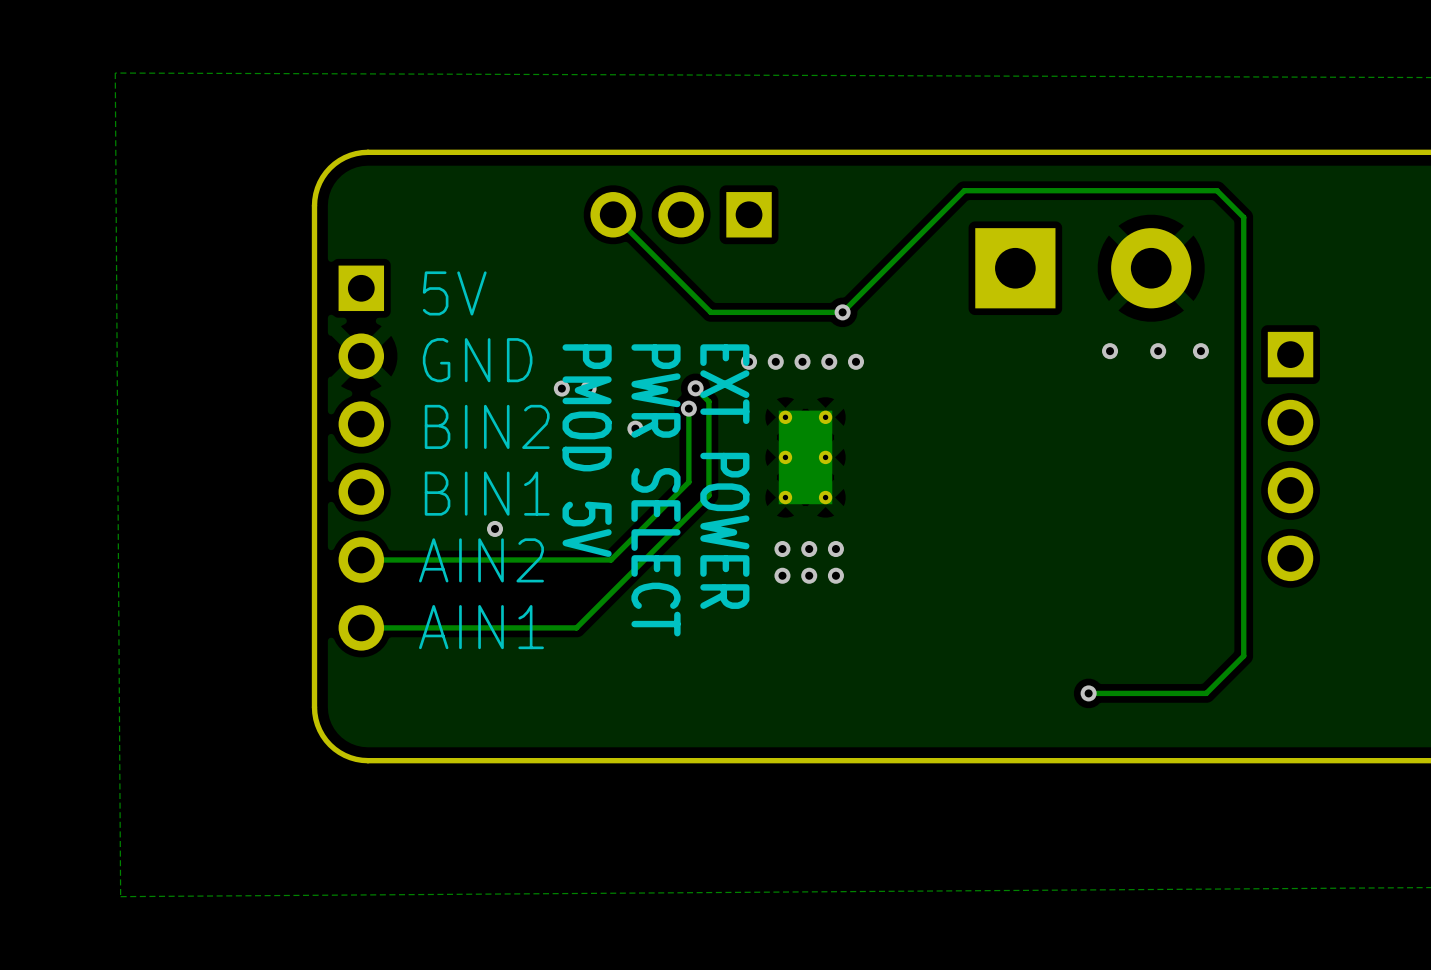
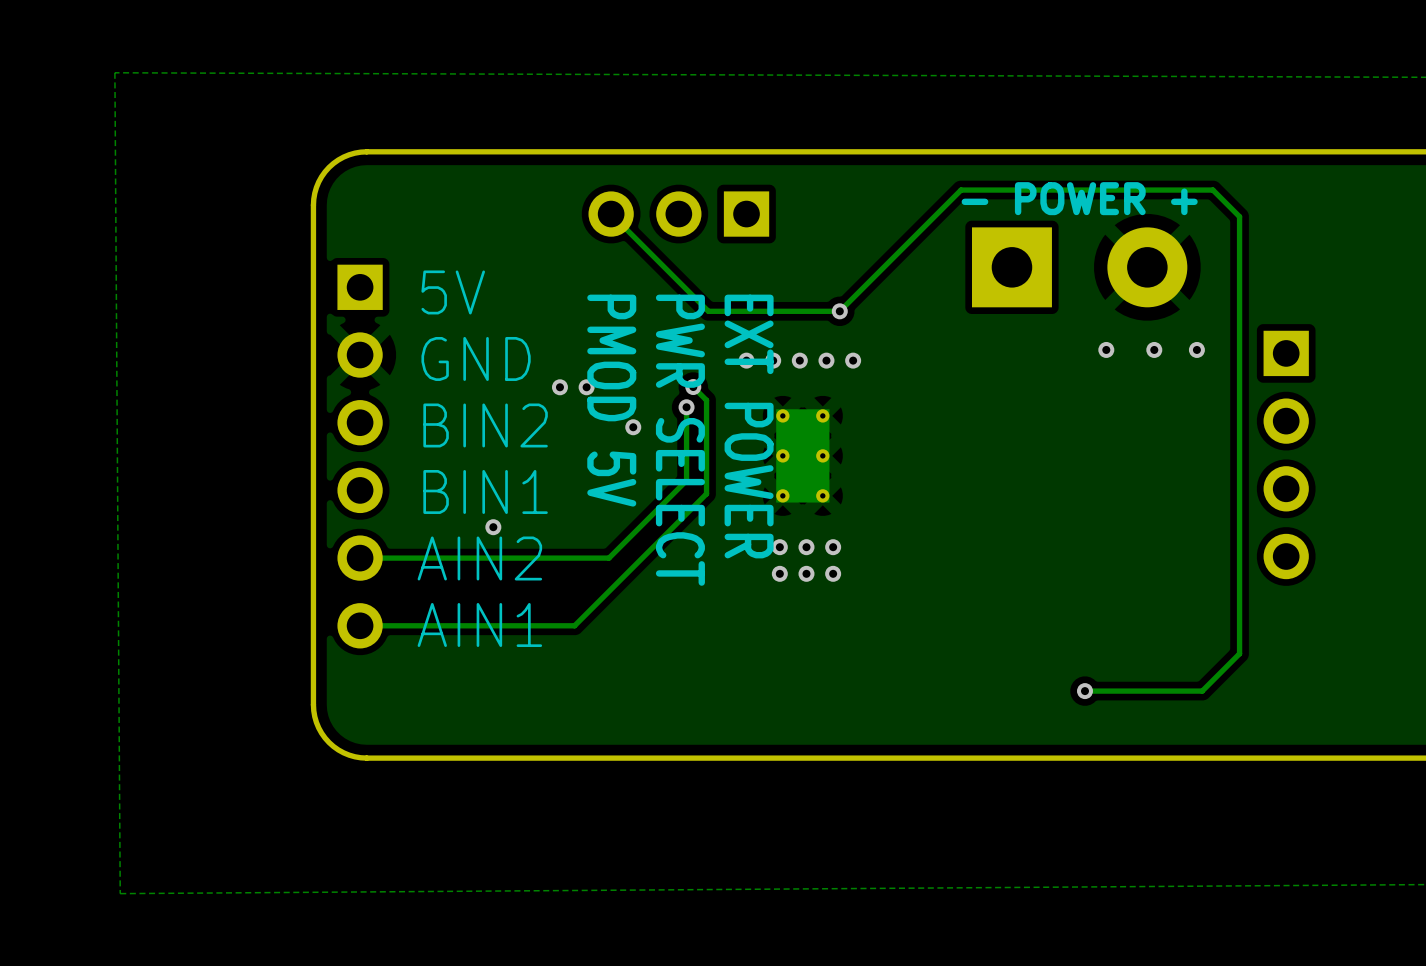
text: none -> - POWER + (1079, 198)
text position: PMOD 5V (587, 450) -> PMOD 5V (611, 400)
text position: EXT POWER (724, 476) -> EXT POWER (749, 426)
text position: PWR SELECT (655, 490) -> PWR SELECT (680, 440)

